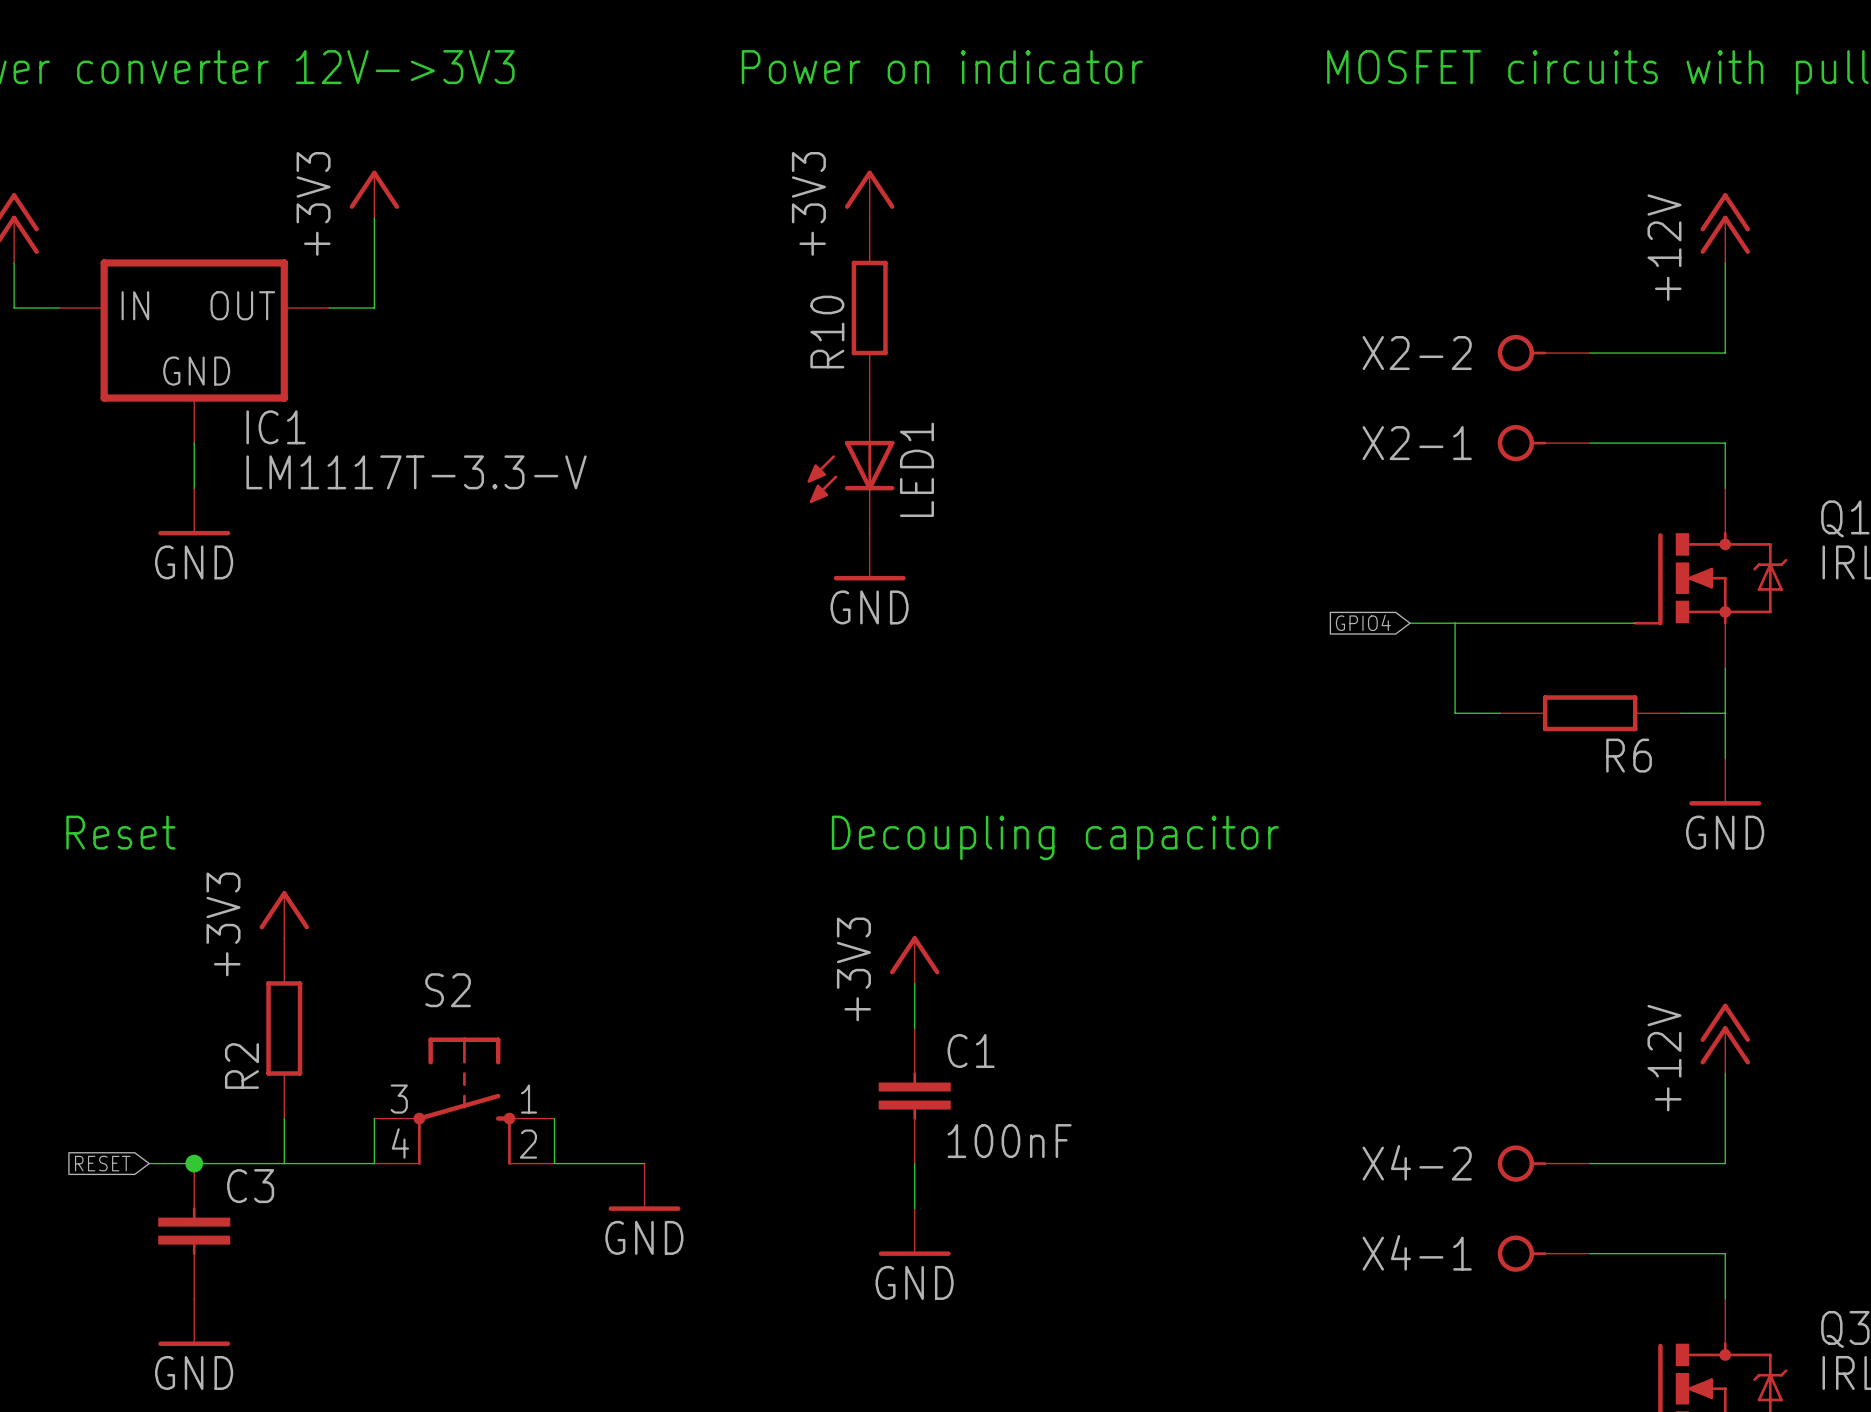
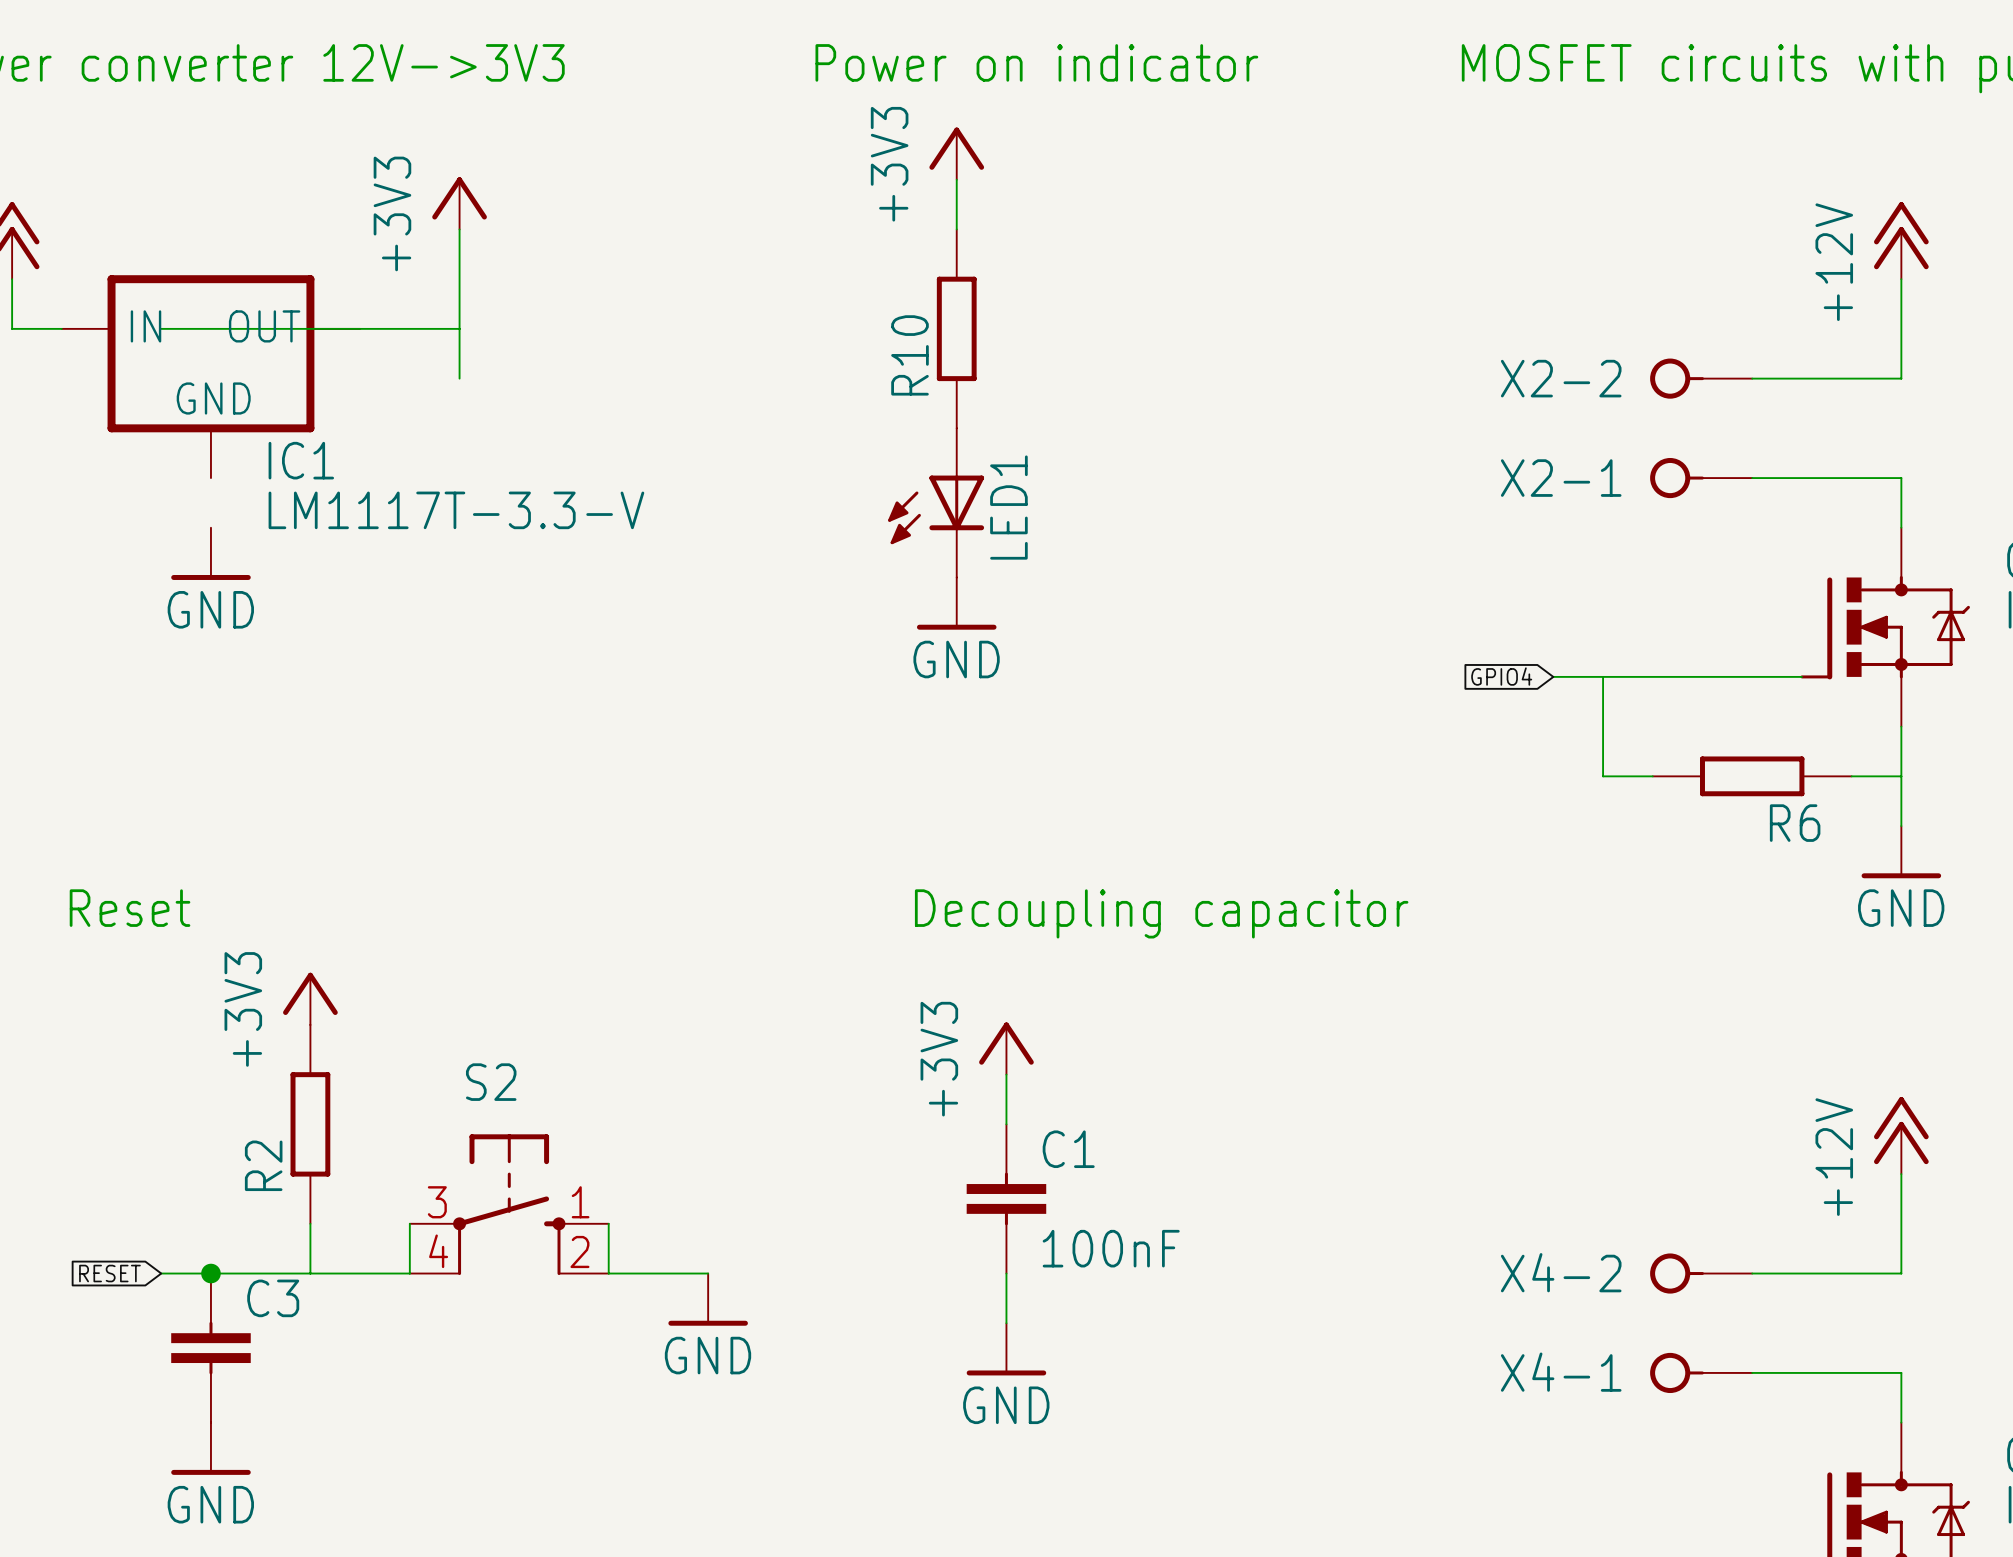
power symbol position: +3V3 (374, 194) -> +3V3 (459, 203)
power symbol position: +3V3 (869, 194) -> +3V3 (956, 153)
wire: (374, 217) (374, 308) -> (459, 328) (409, 328)
wire: none -> (459, 229) (459, 378)
wire: none -> (161, 328) (360, 328)
wire: (194, 443) (194, 488) -> none

